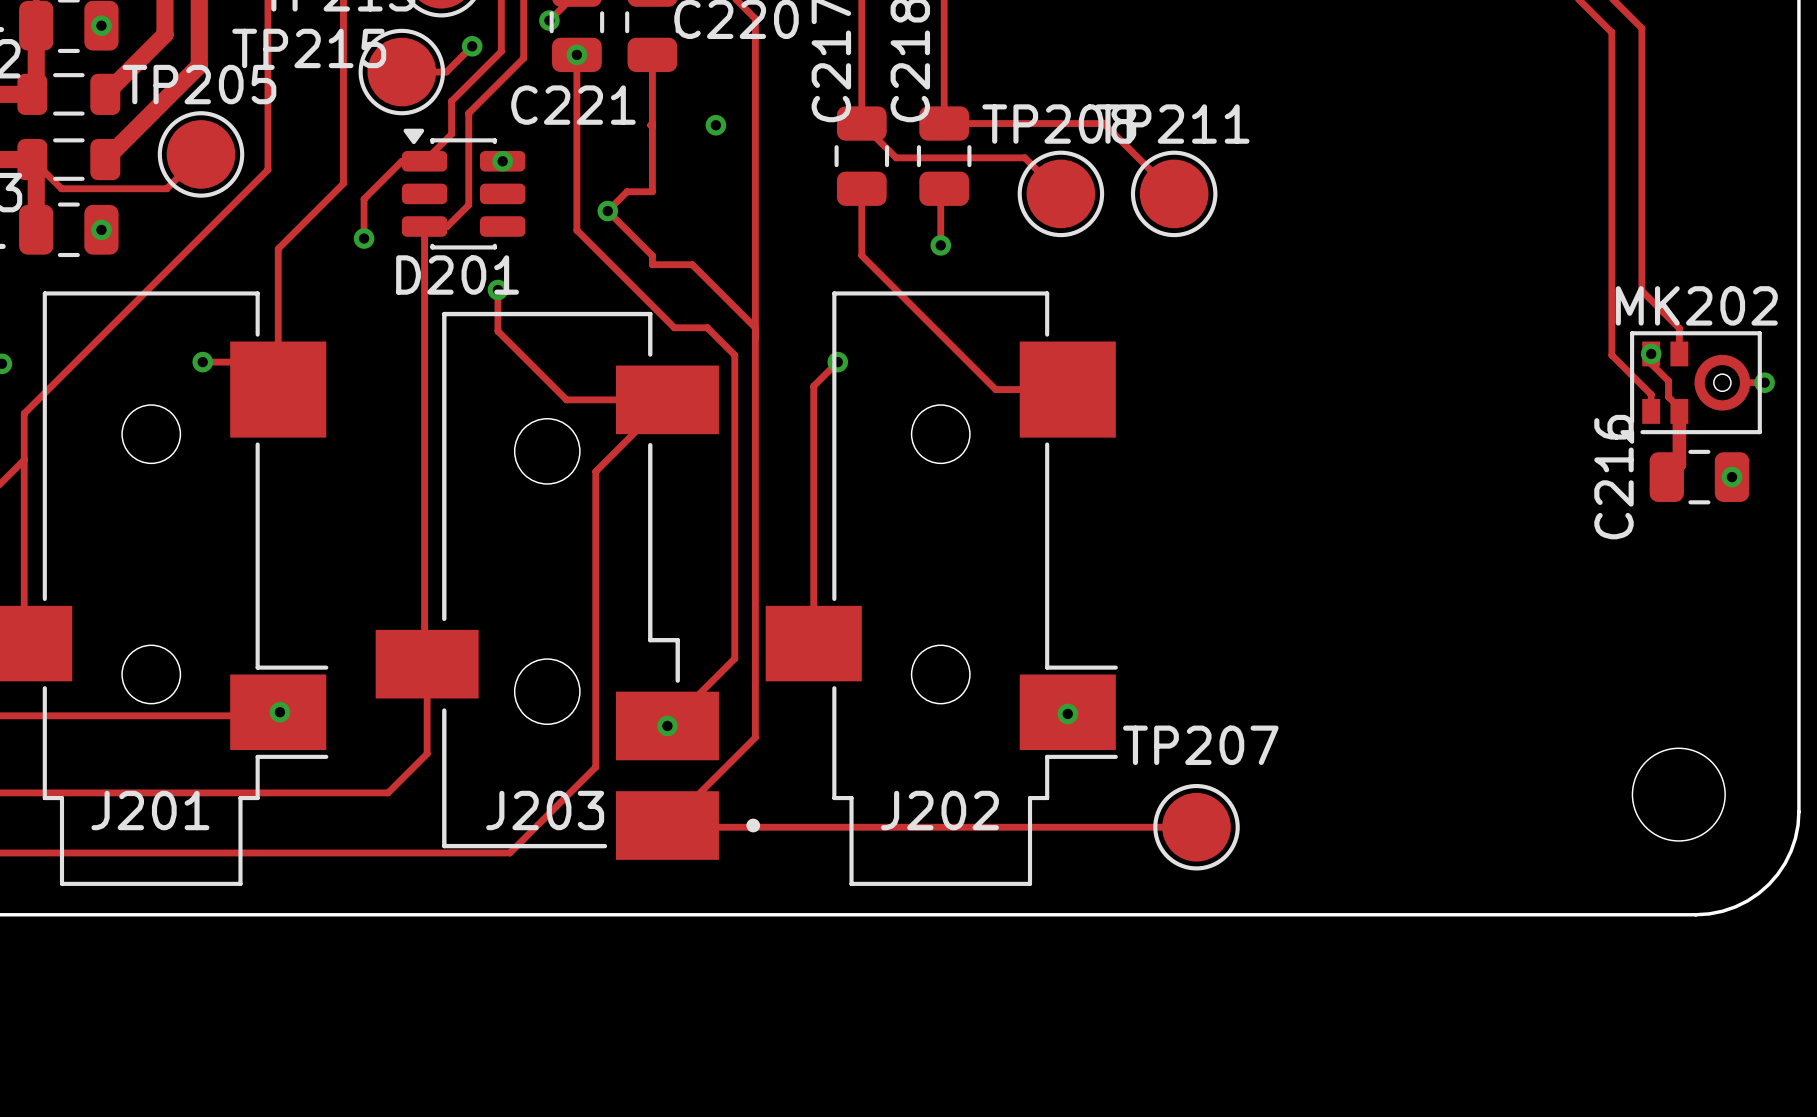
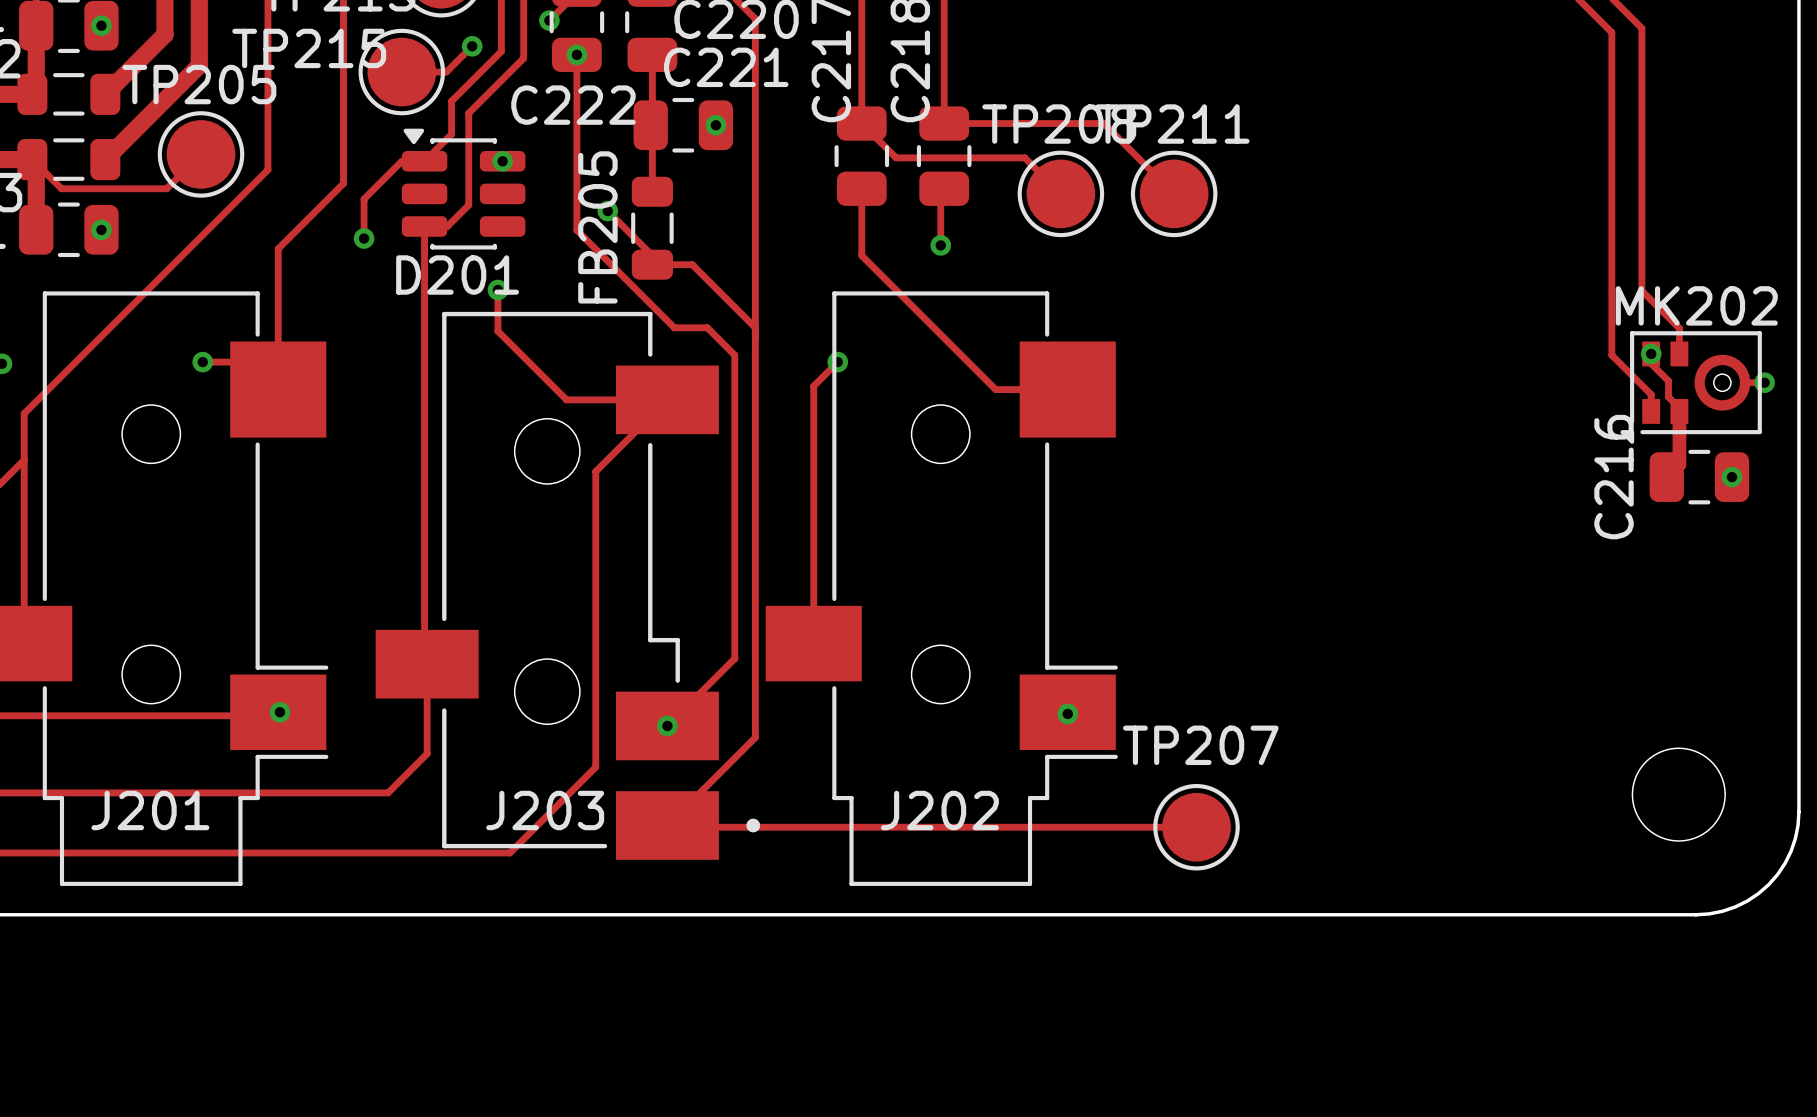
C221 name: C221 (573, 105) -> C222 (573, 105)
C221: none -> (683, 125)
track: (652, 191) (627, 191) (607, 211) -> none
FB205: none -> (652, 228)

